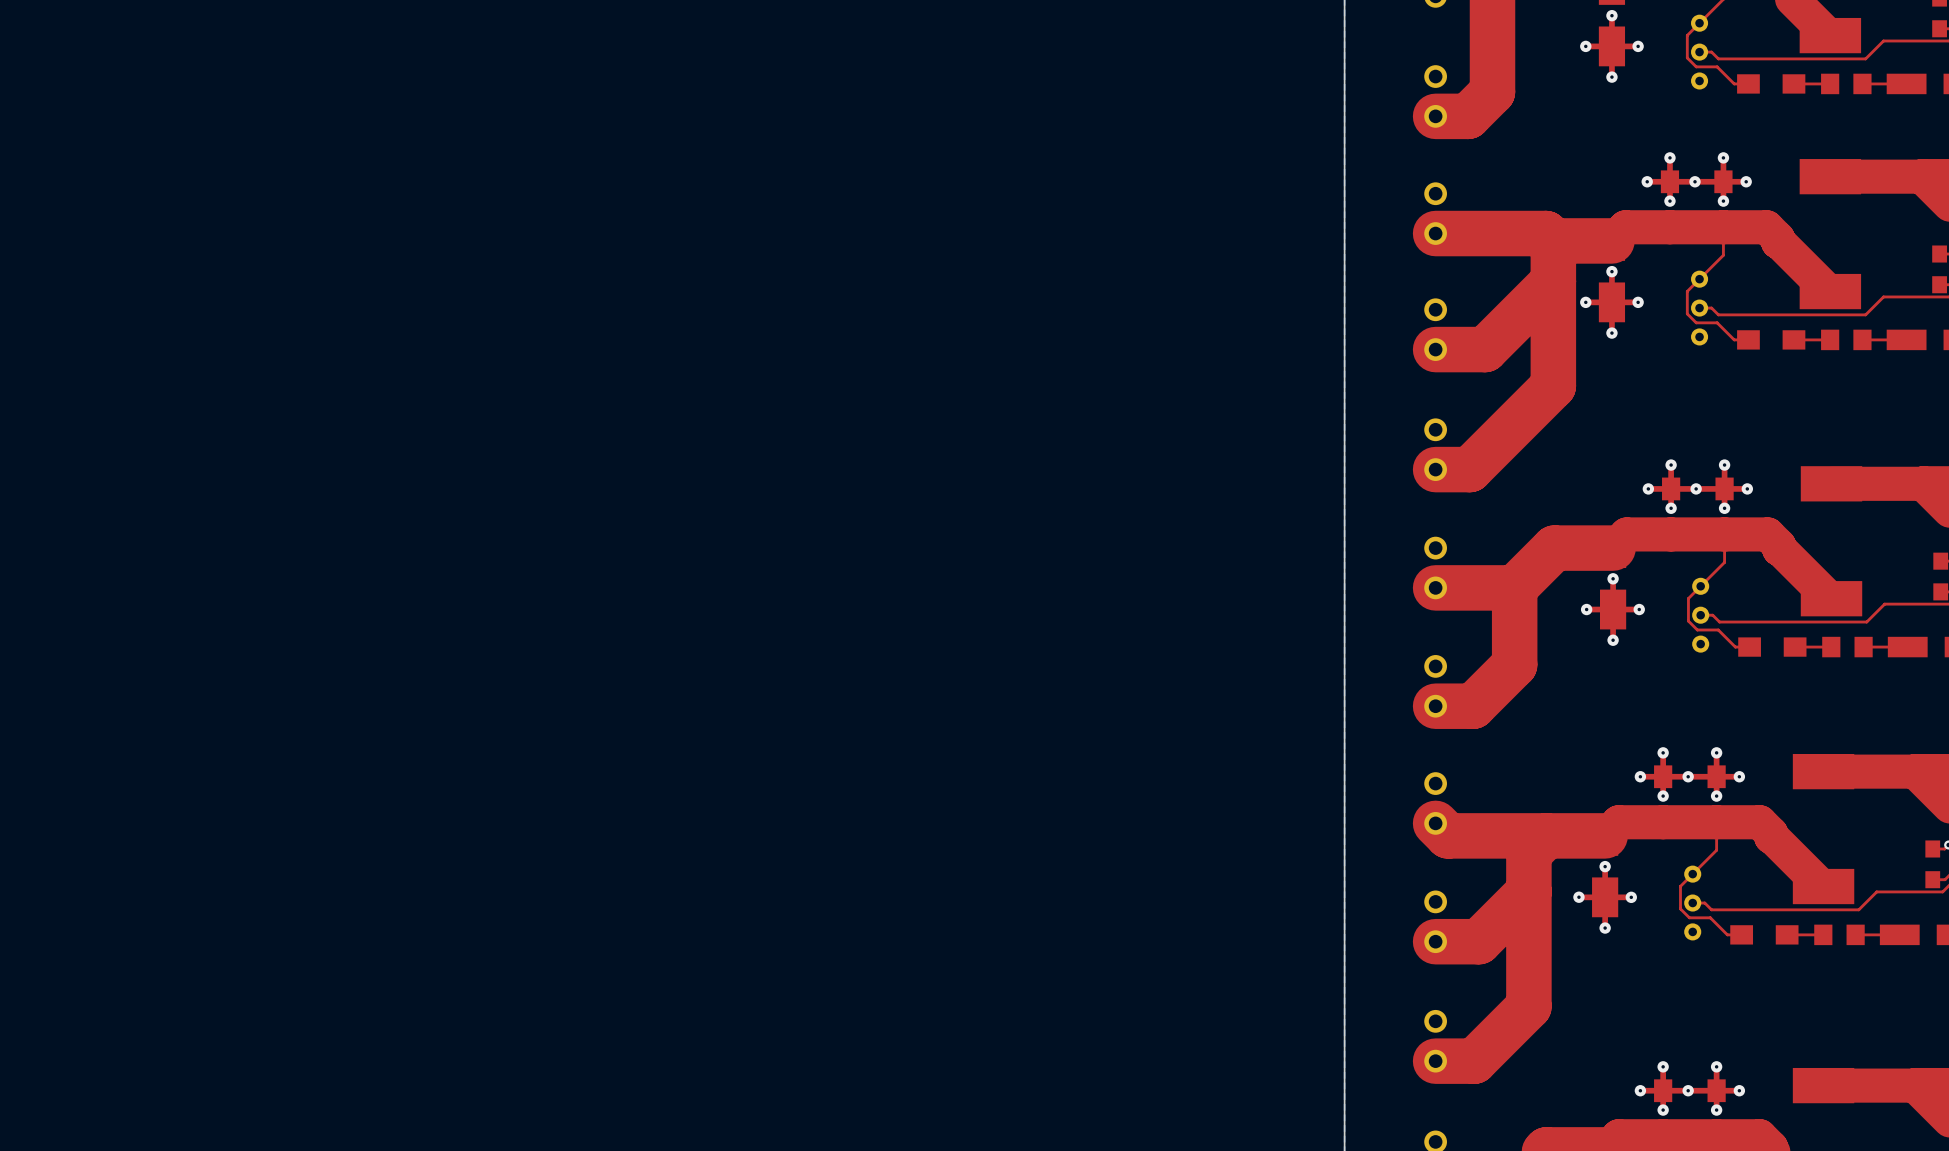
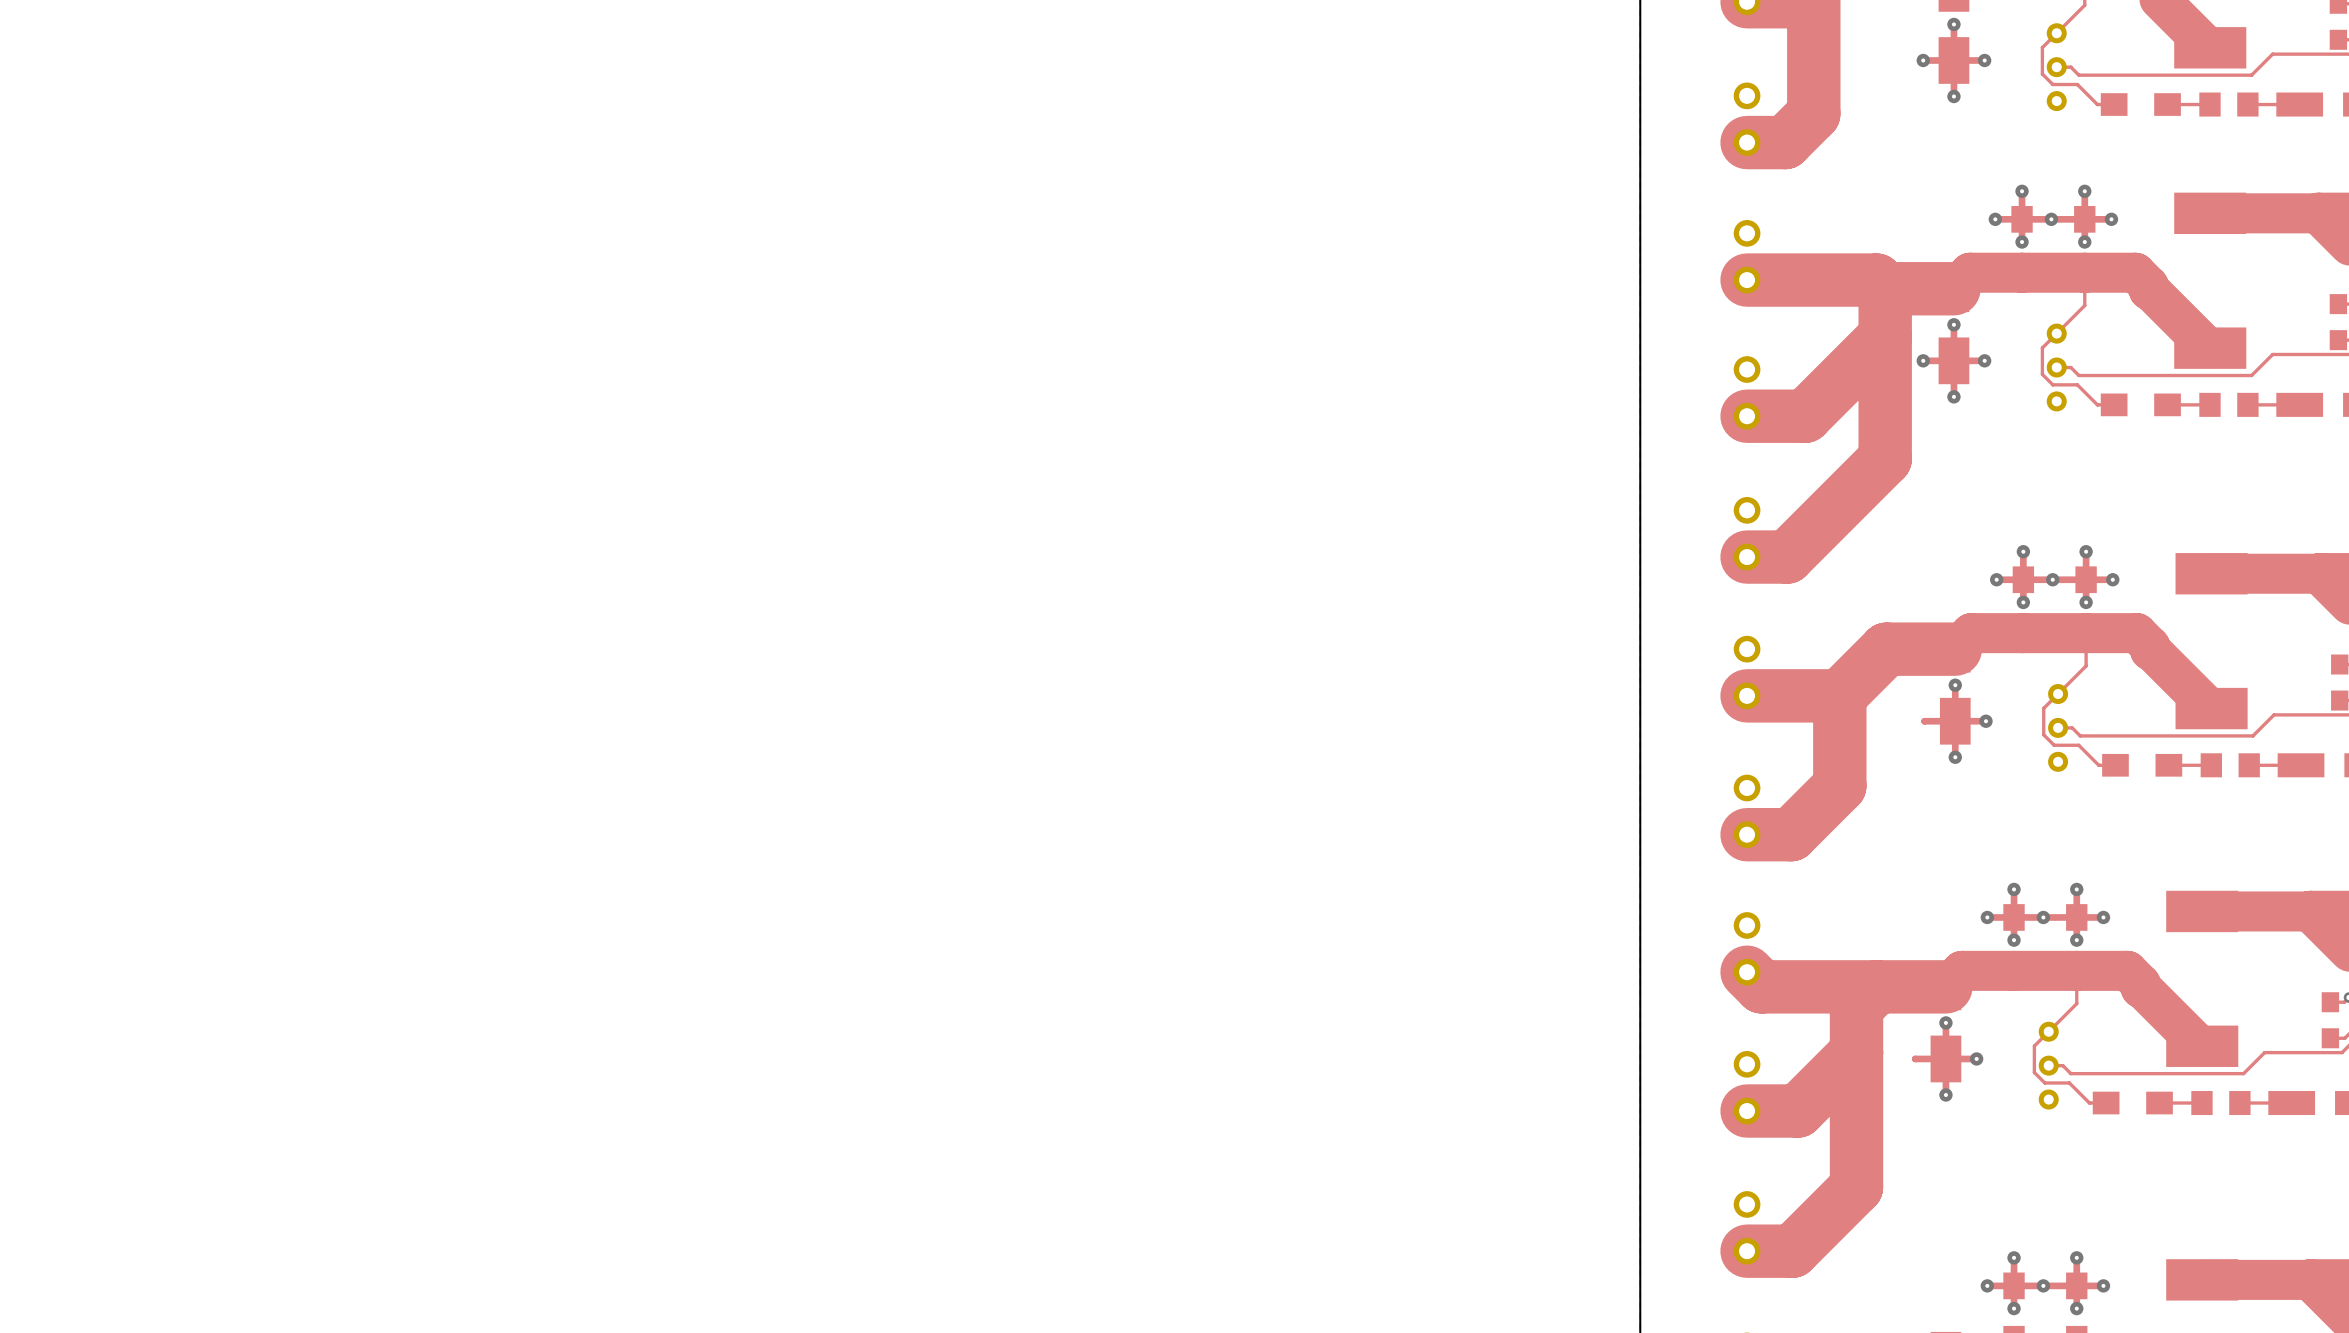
via: (1586, 609) -> none
via: (1578, 897) -> none

